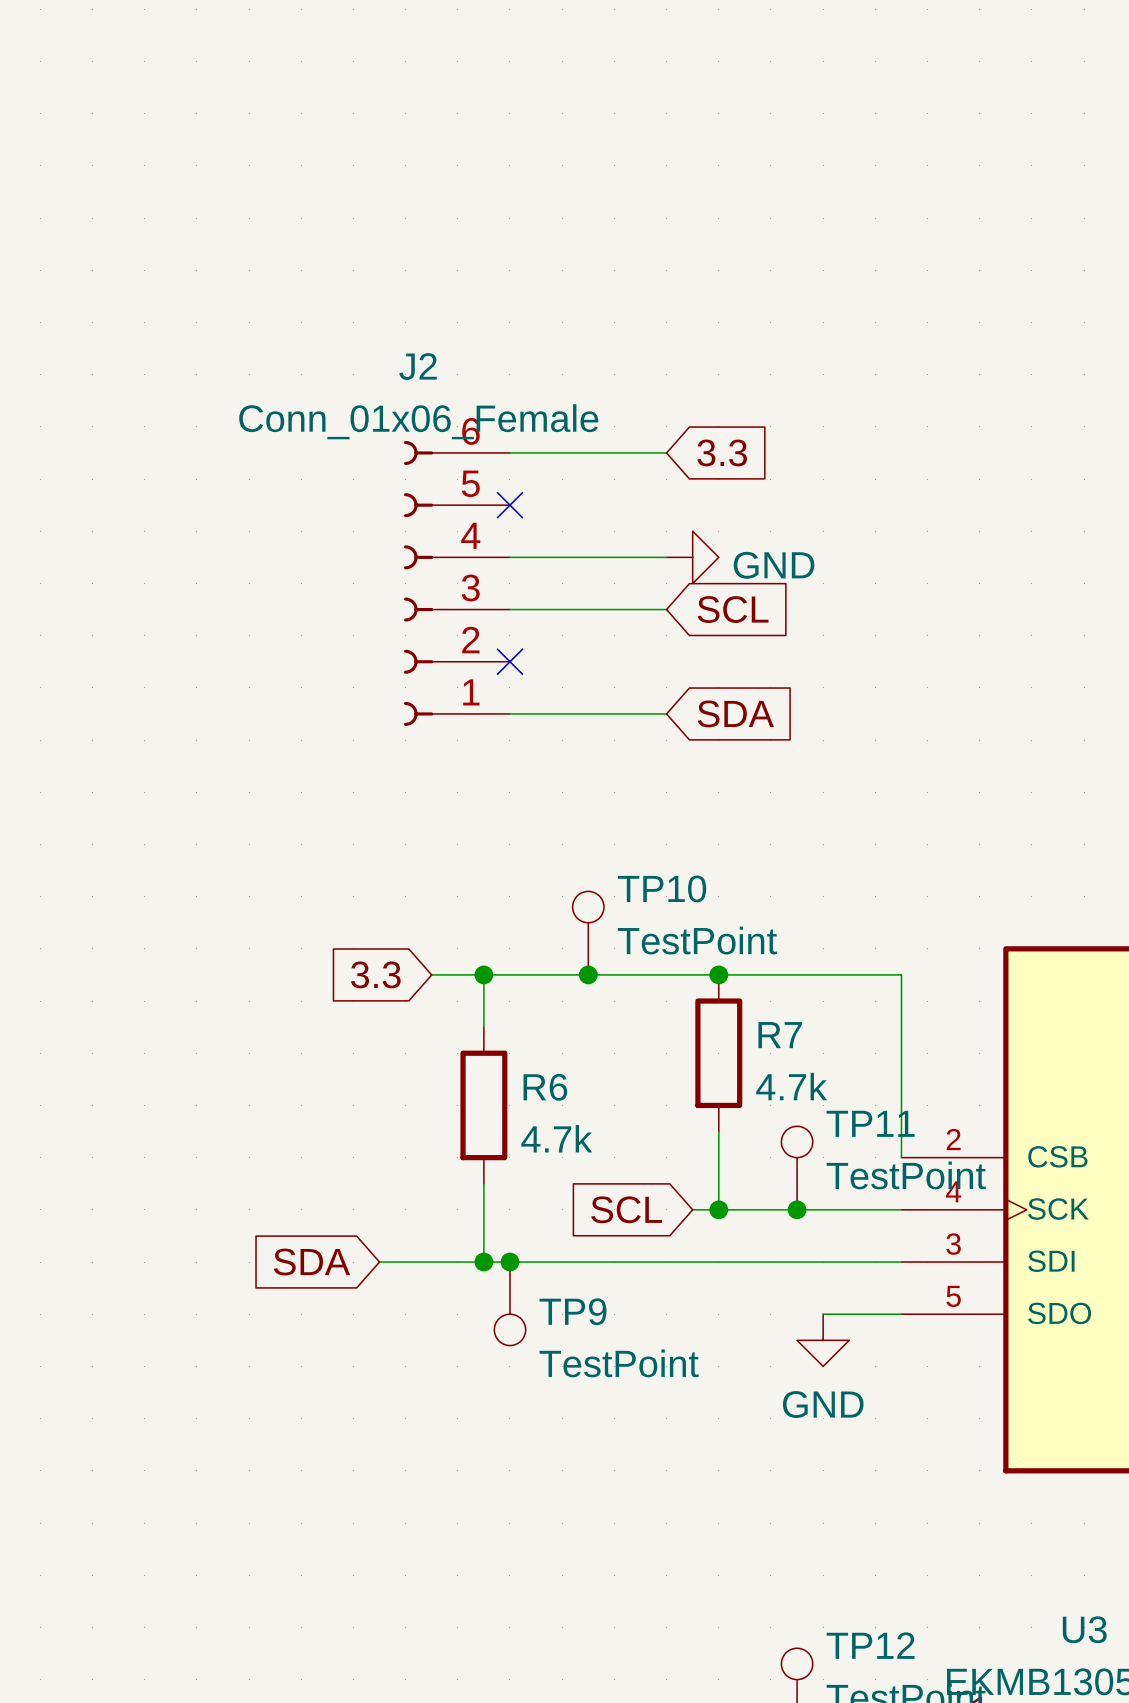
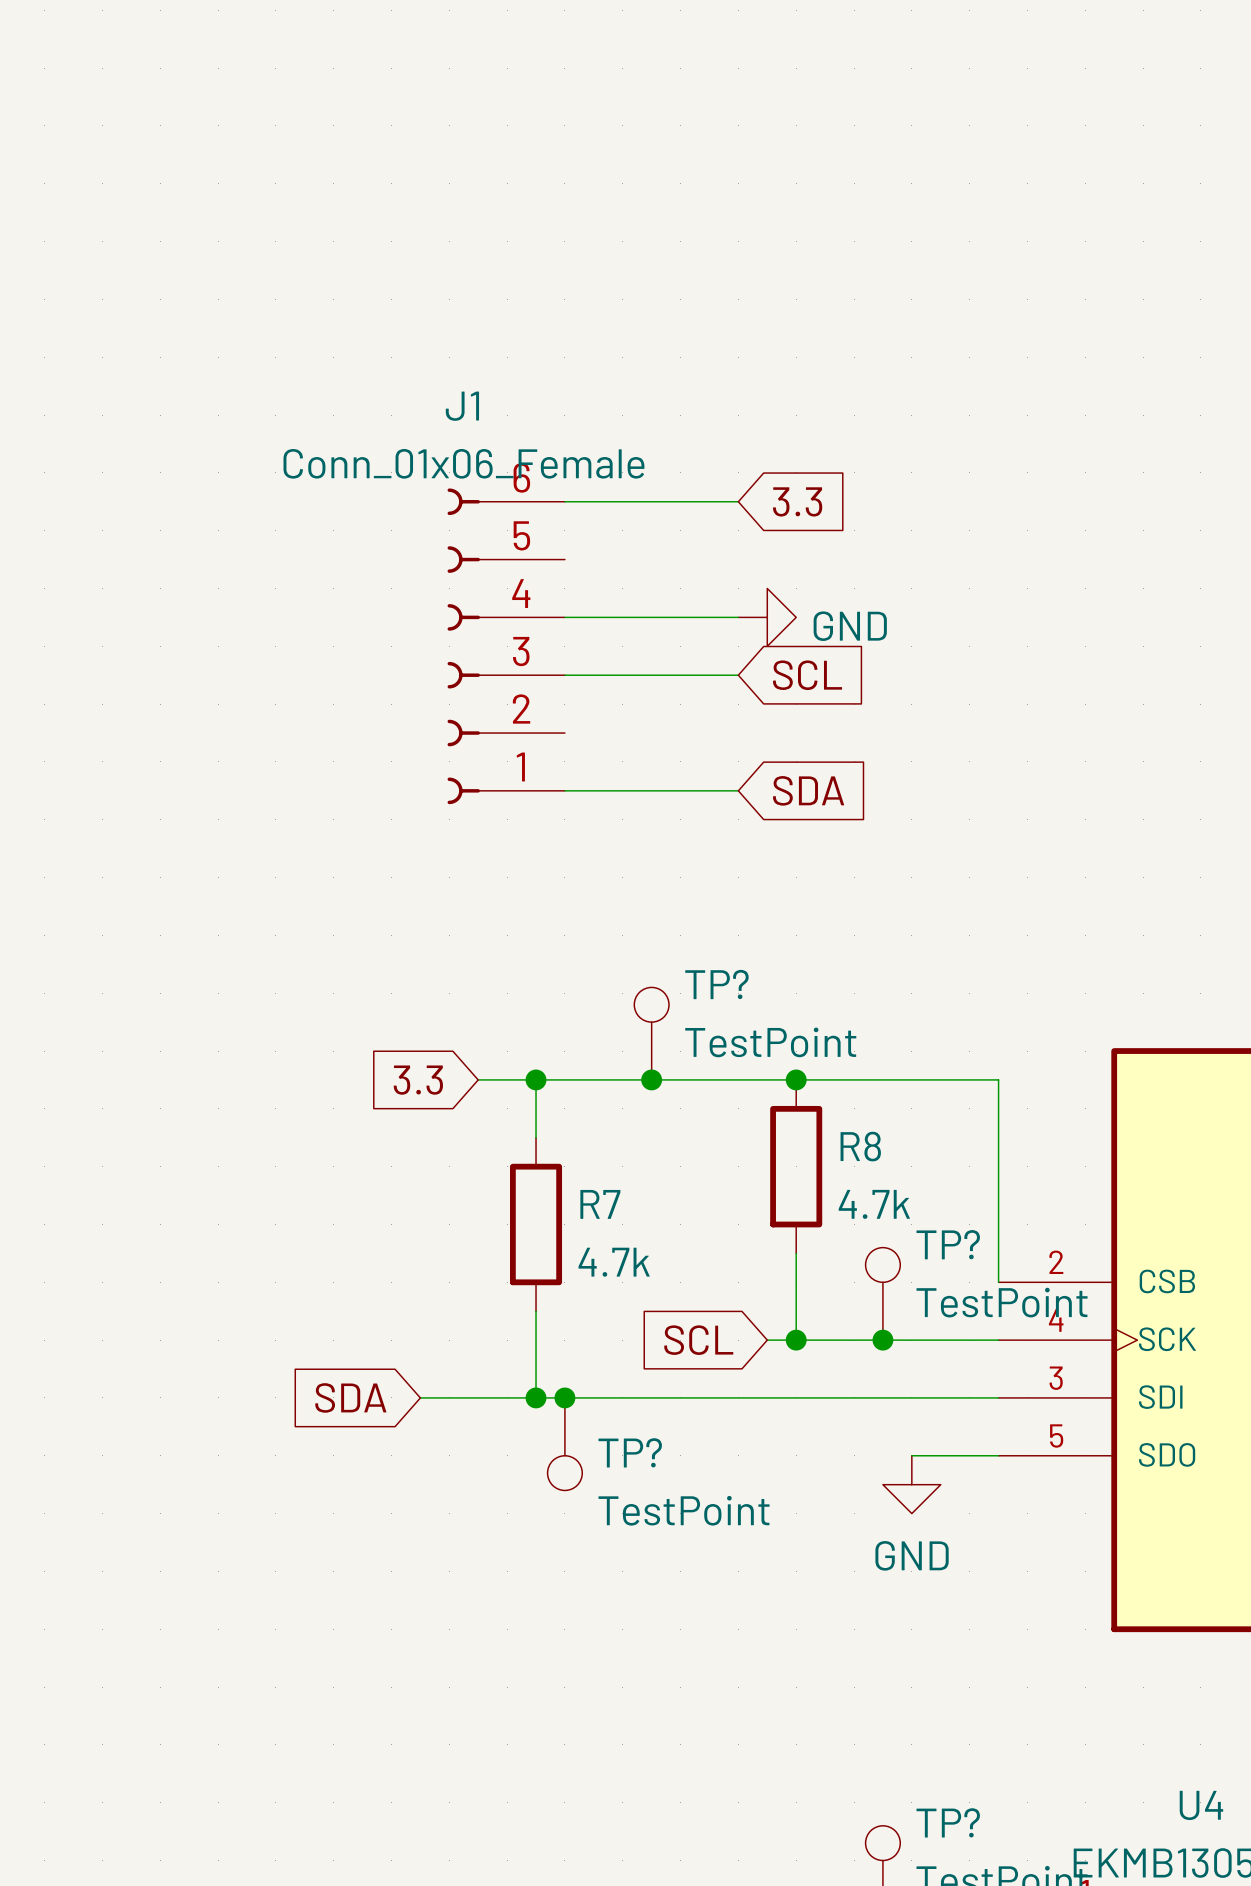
J2 name: J2 (417, 366) -> J1 (462, 406)
no-connect mark: (509, 505) -> none
no-connect mark: (509, 661) -> none
TP10 name: TP10 (662, 888) -> TP? (716, 984)
R7 name: R7 (780, 1035) -> R8 (860, 1146)
R6 name: R6 (545, 1087) -> R7 (600, 1204)
TP11 name: TP11 (870, 1123) -> TP? (948, 1244)
TP9 name: TP9 (573, 1311) -> TP? (630, 1452)
U3 name: U3 (1084, 1629) -> U4 (1201, 1805)
TP12 name: TP12 (870, 1645) -> TP? (948, 1822)

